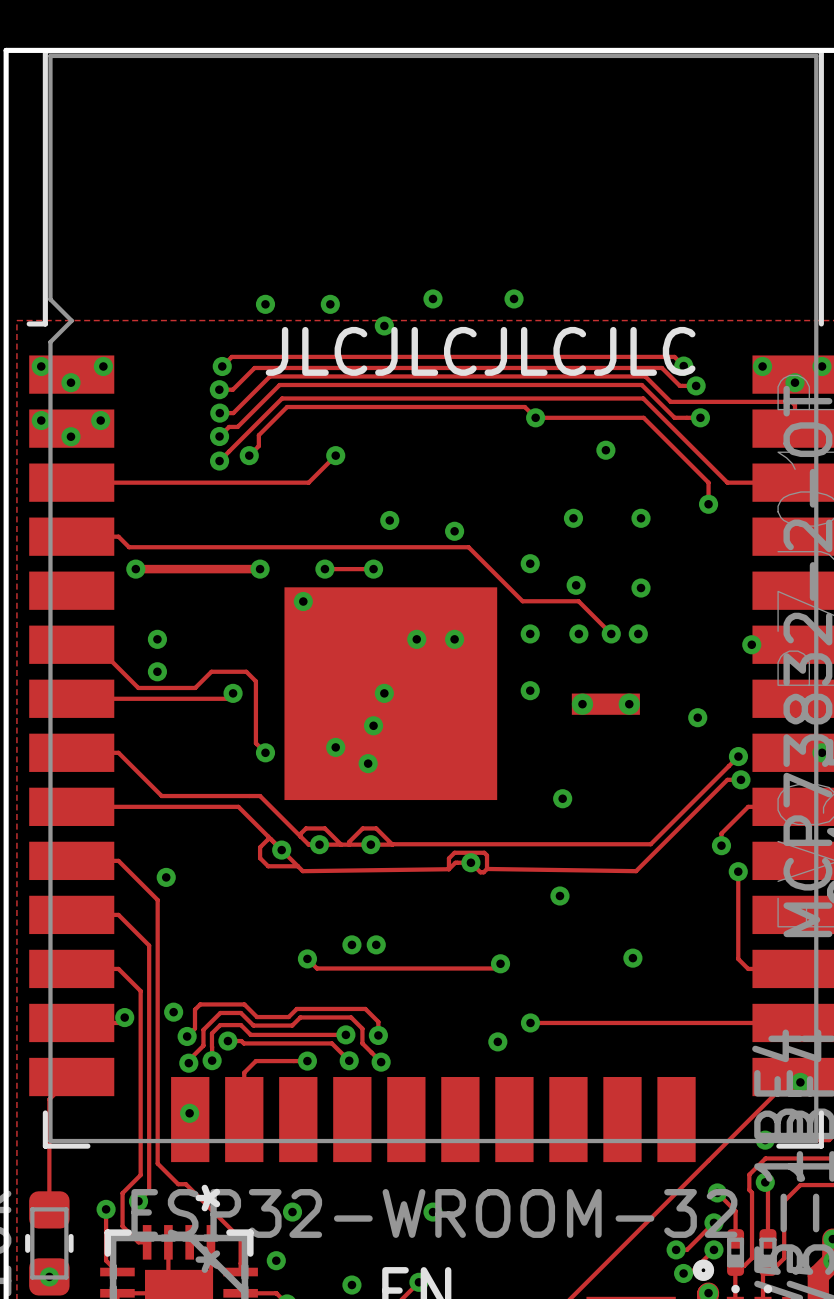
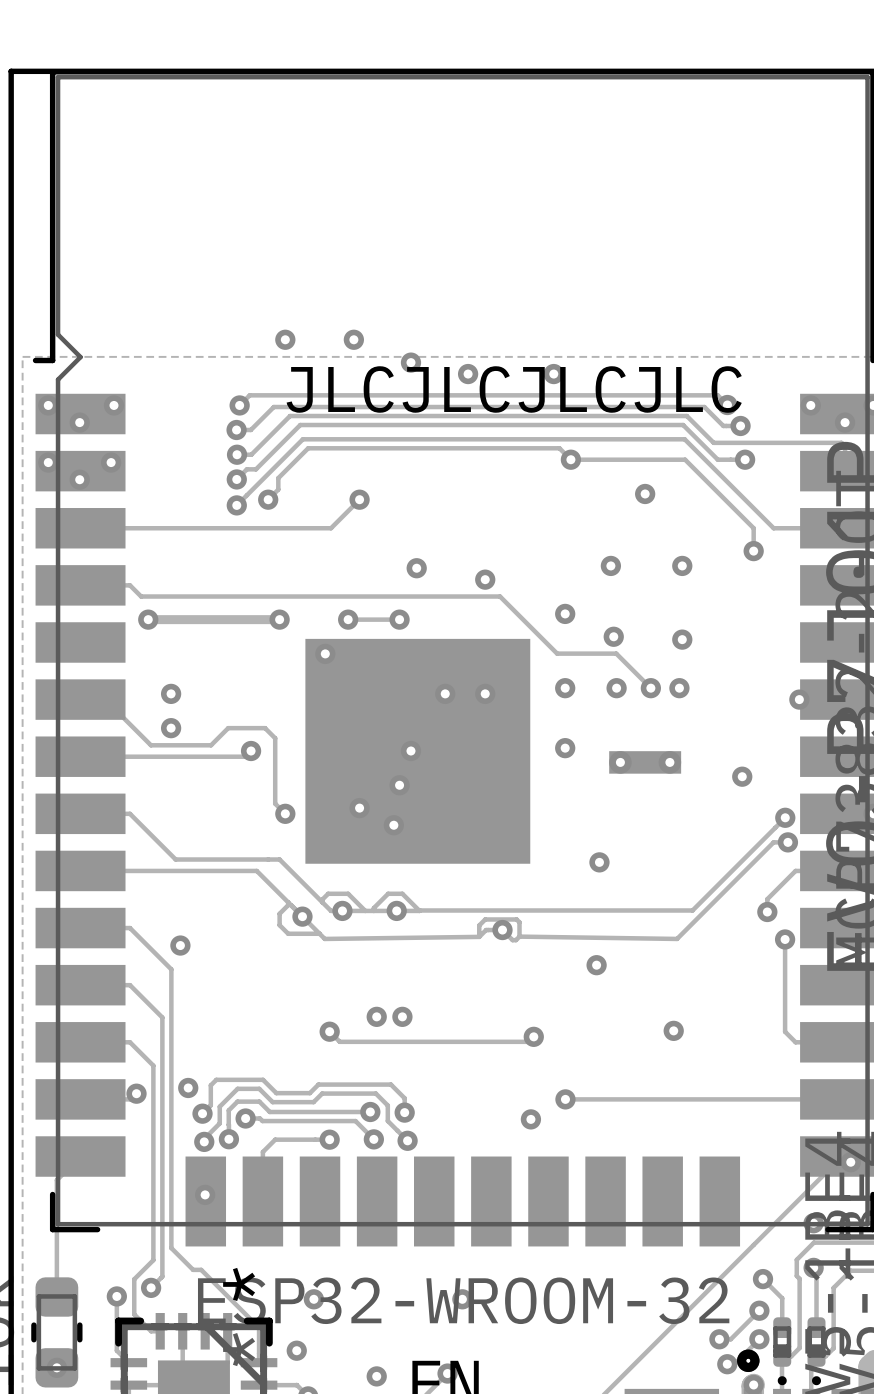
via position: (432, 298) -> (468, 374)
via position: (514, 298) -> (553, 374)

